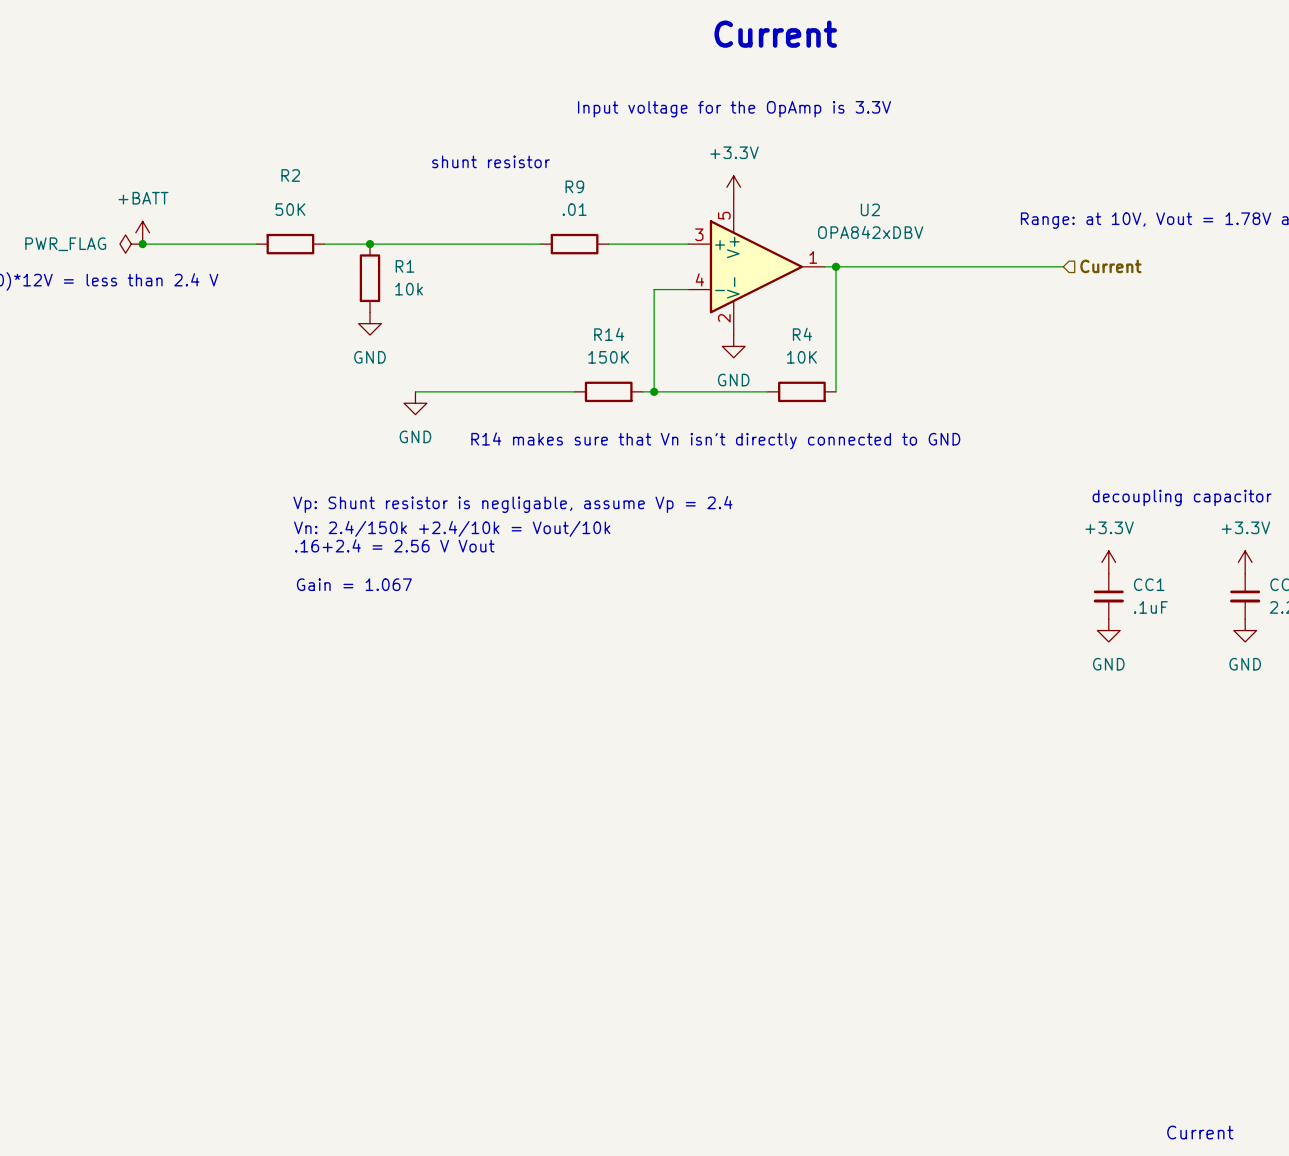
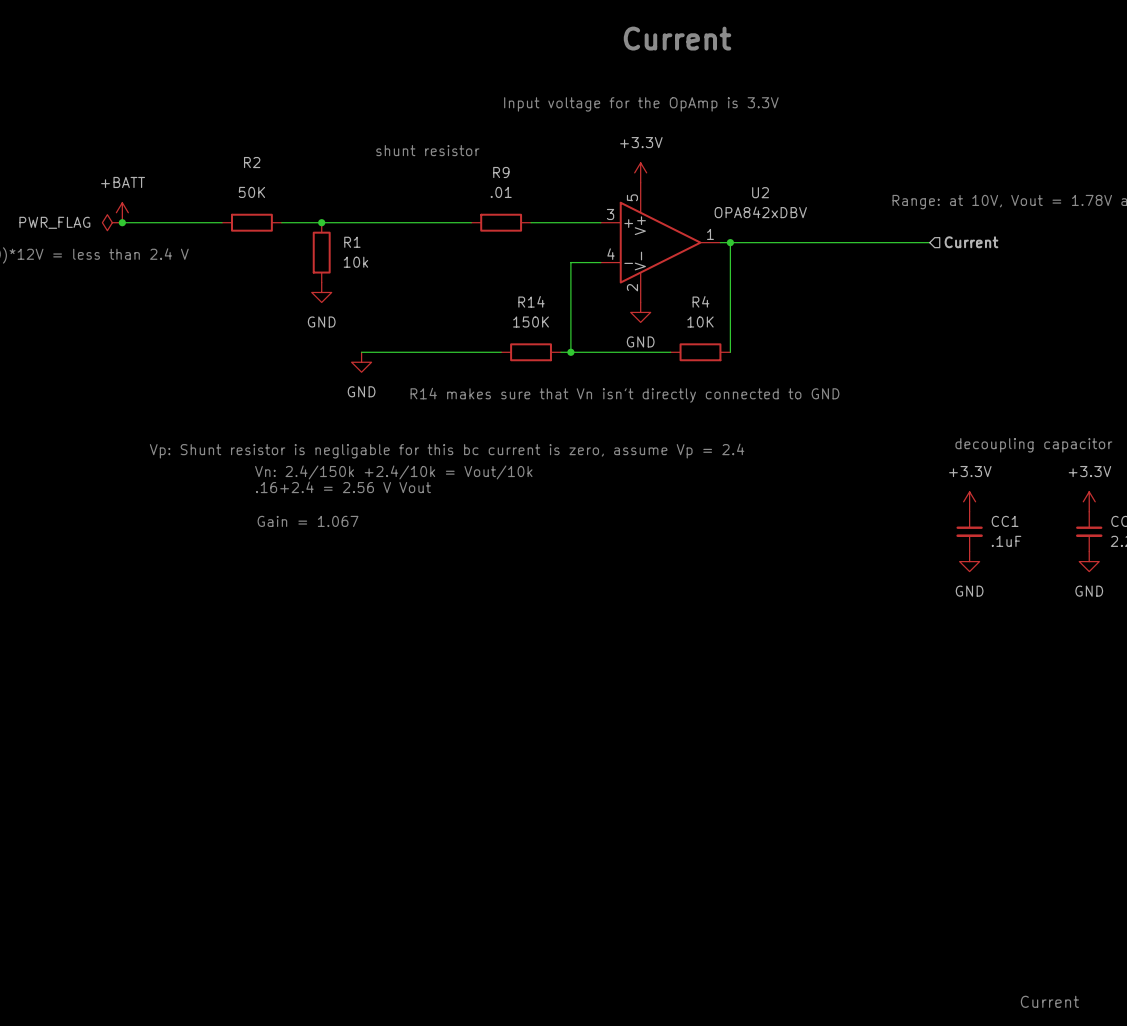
text: Vp: Shunt resistor is negligable, assume Vp = 2.4 (512, 504) -> Vp: Shunt resistor is negligable for this bc current is zero, assume Vp = 2.4 (447, 451)

